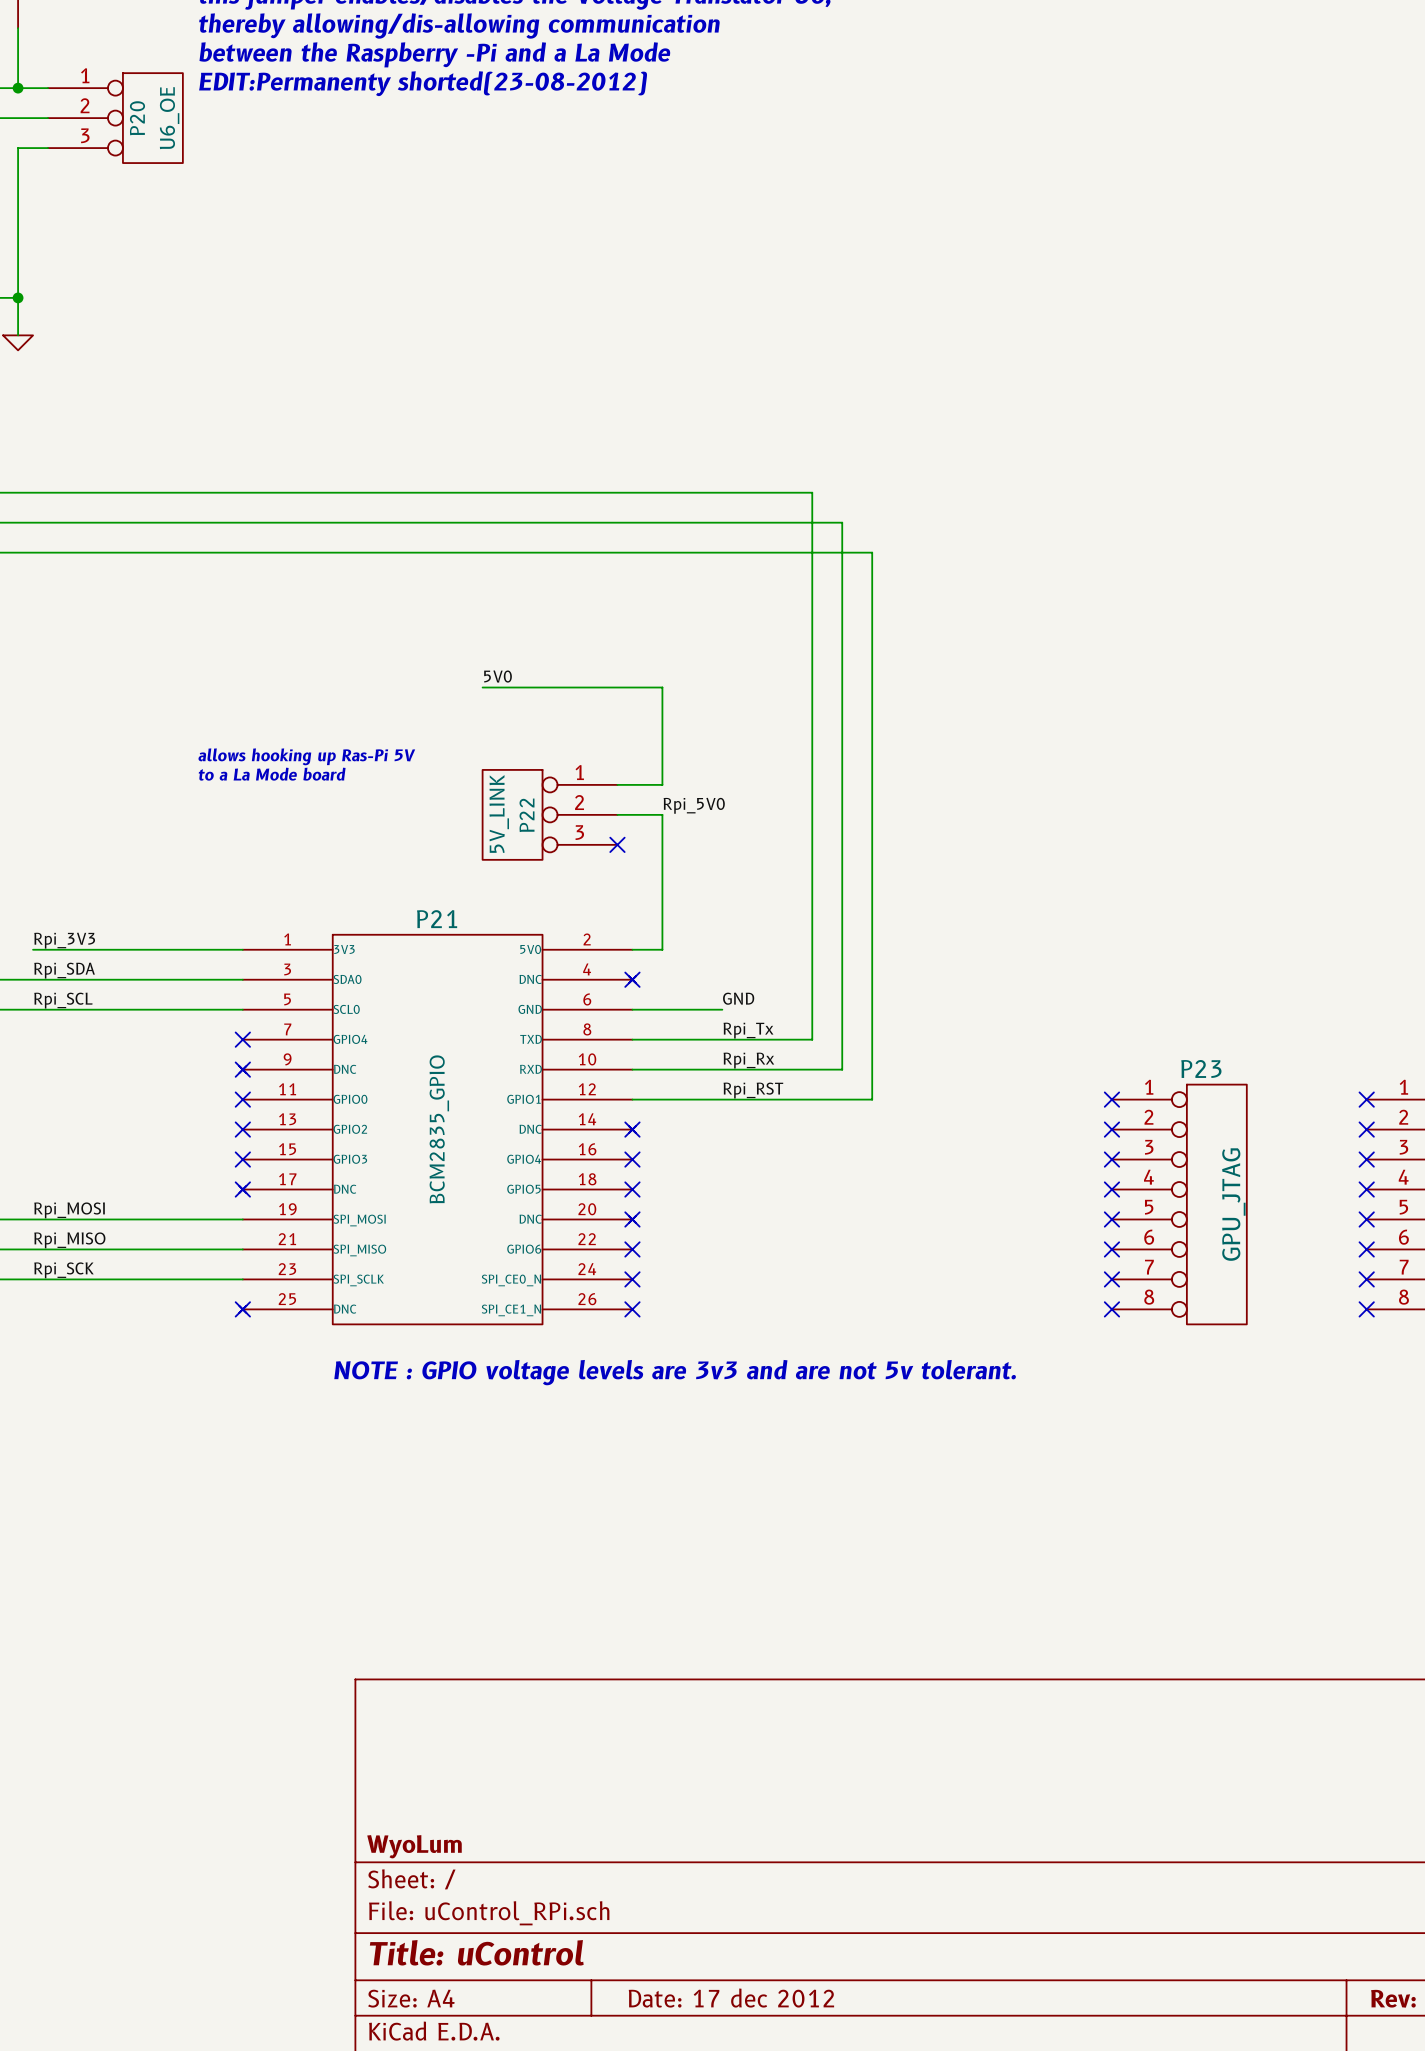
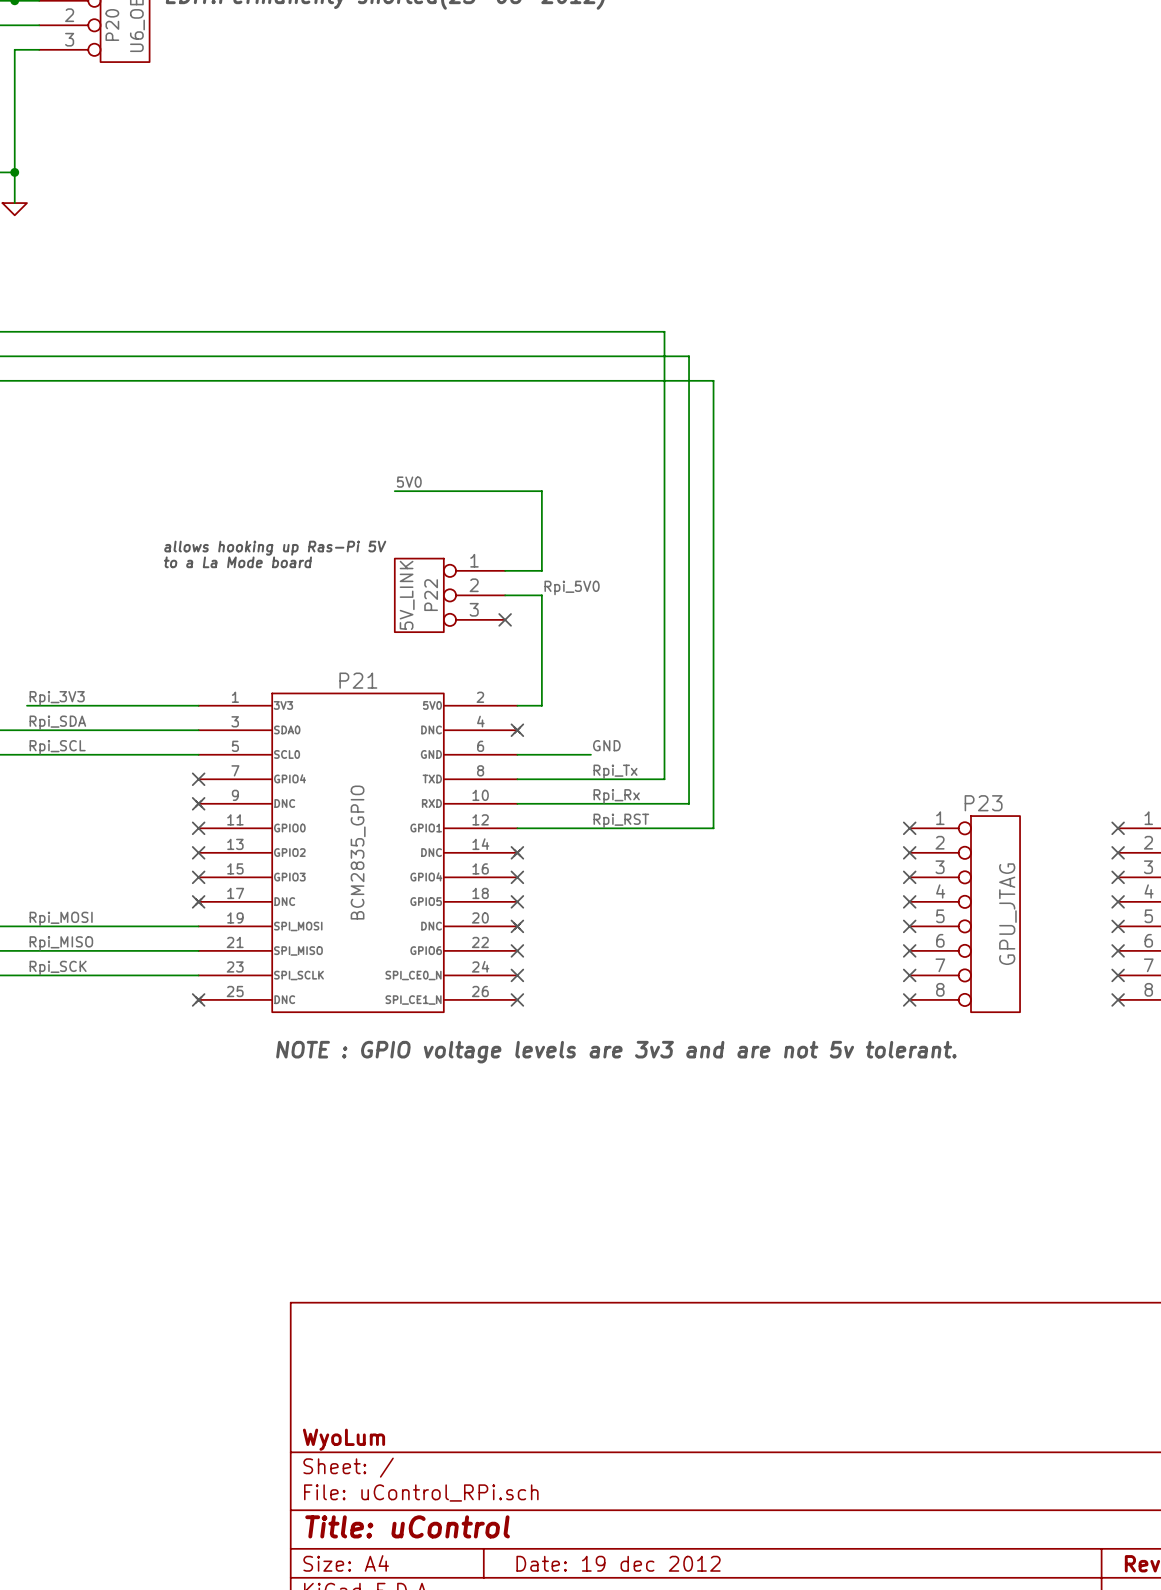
title block: Date: 17 dec 2012 (731, 1998) -> Date: 19 dec 2012 (618, 1563)

